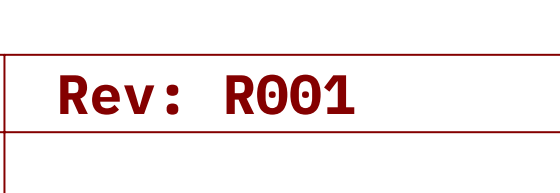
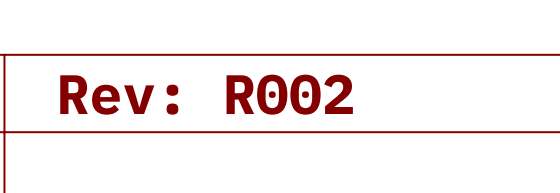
title block: Rev: R001 (207, 94) -> Rev: R002 (206, 94)

